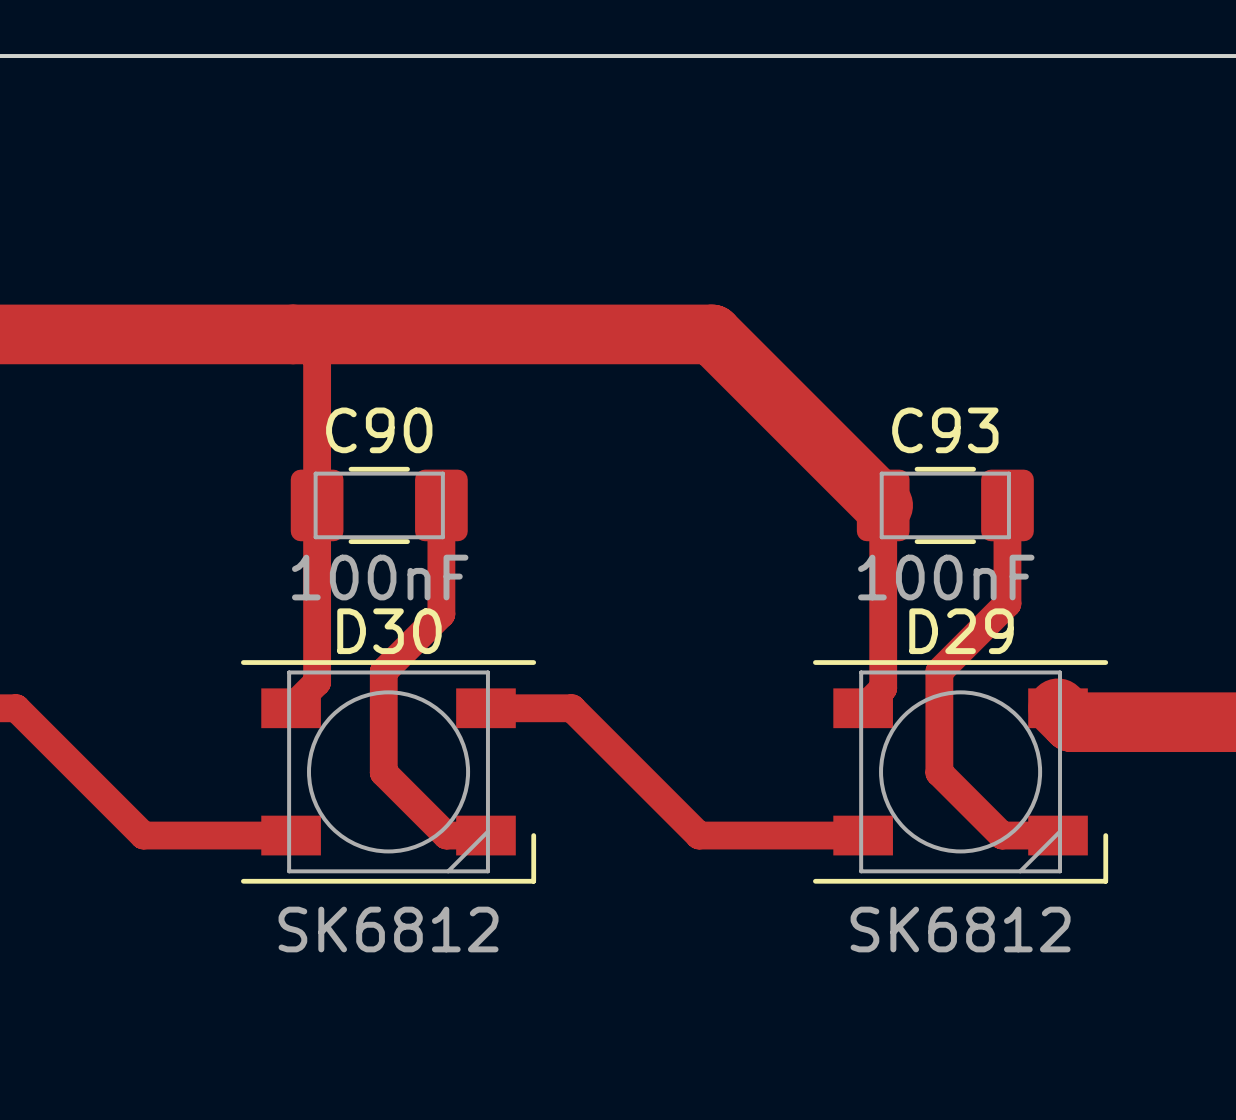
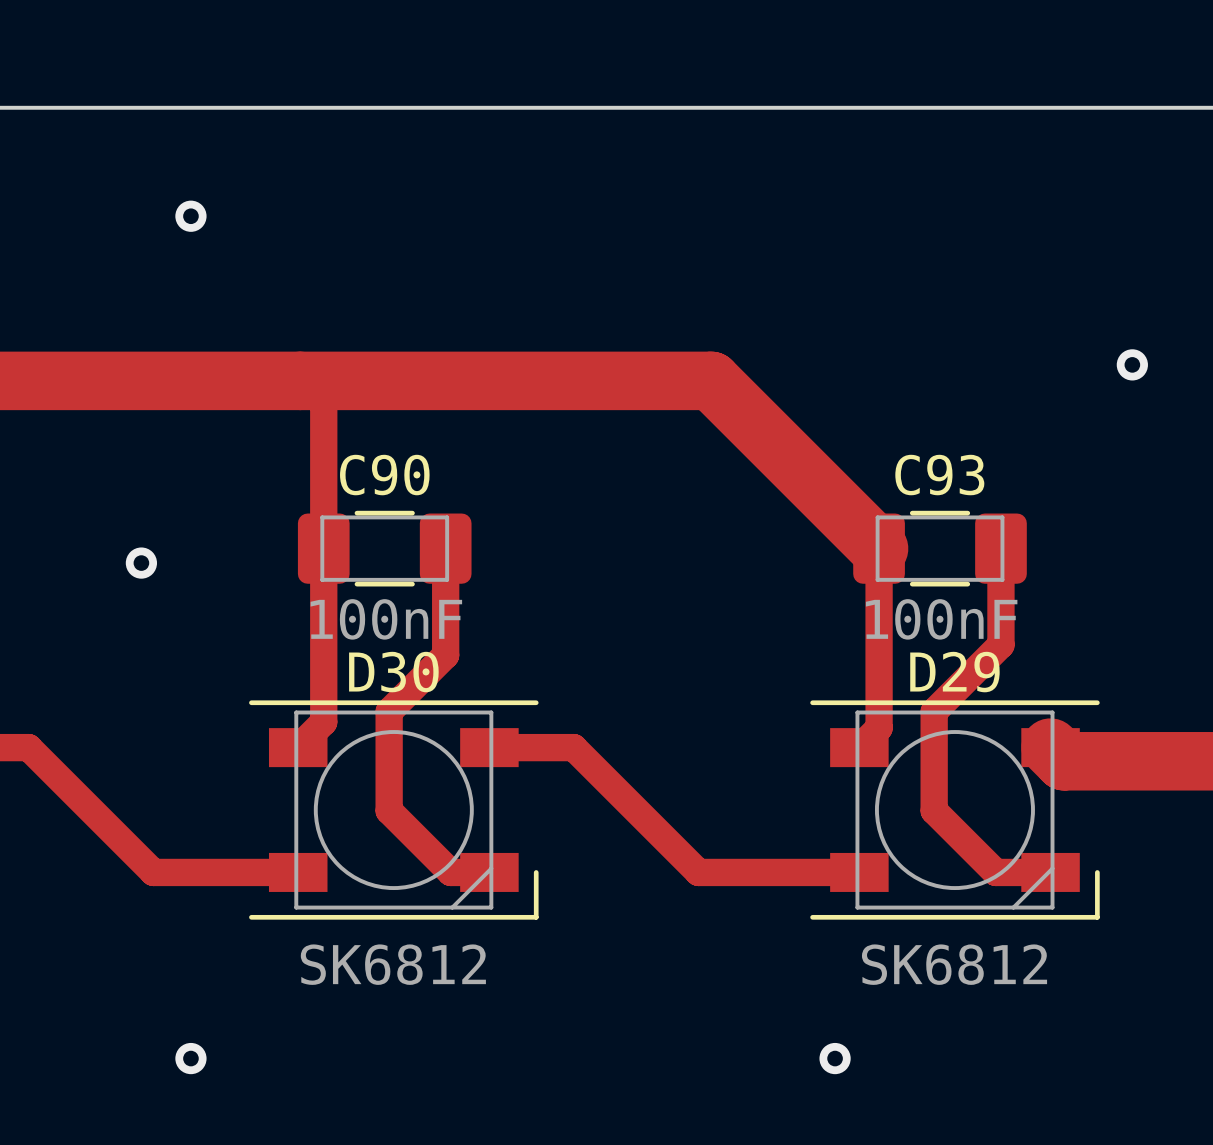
via: none -> (190, 216)
via: none -> (1132, 364)
via: none -> (141, 563)
via: none -> (190, 1058)
via: none -> (835, 1058)

